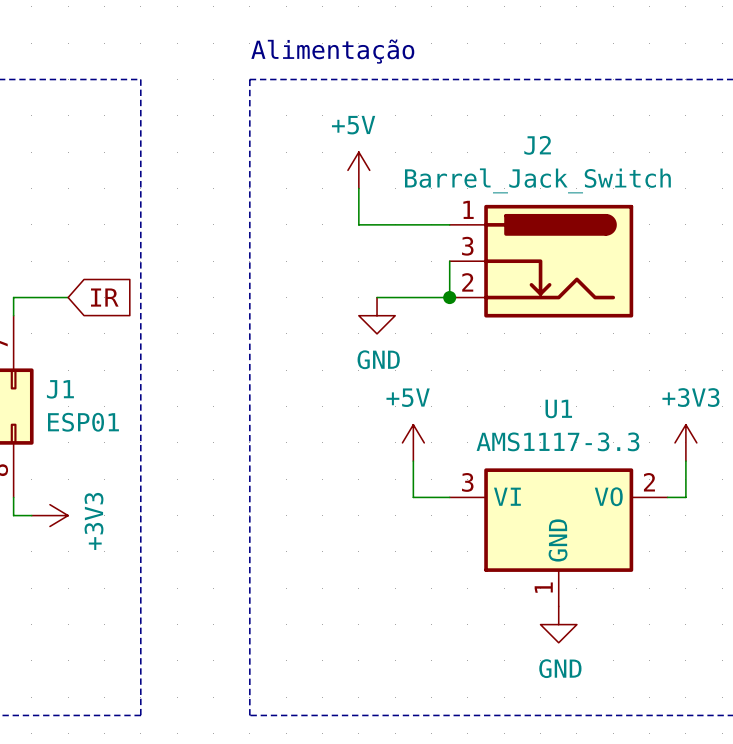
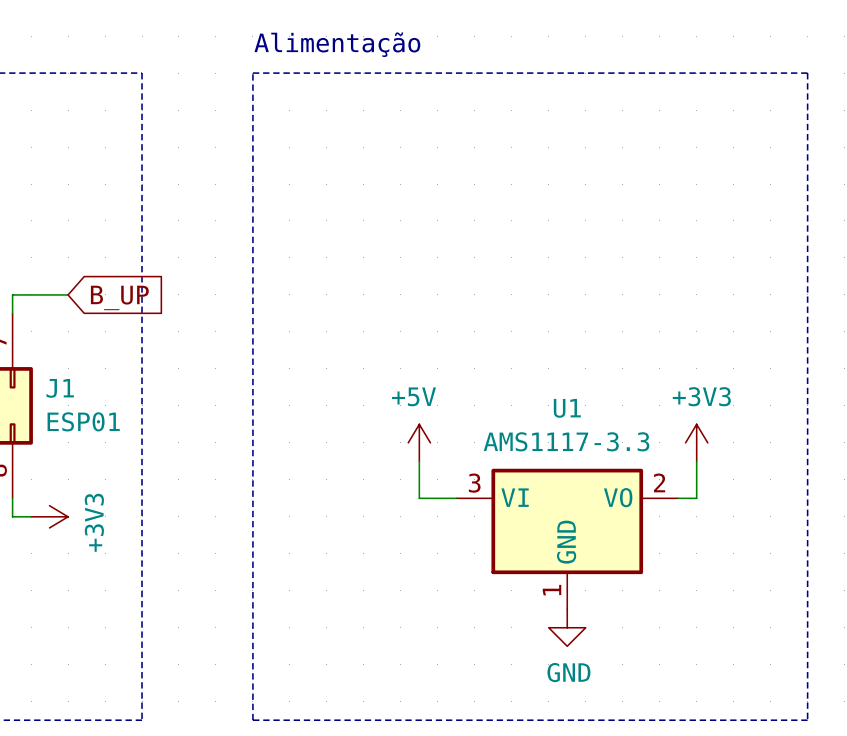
power symbol: +5V (358, 170) -> none
wire: (358, 188) (358, 224) (449, 224) -> none
wire: (449, 261) (449, 297) (377, 297) -> none
J2: Barrel_Jack_Switch (541, 261) -> none
global label: IR (104, 297) -> B_UP (119, 297)
junction: (449, 297) -> none
power symbol: GND (377, 315) -> none

